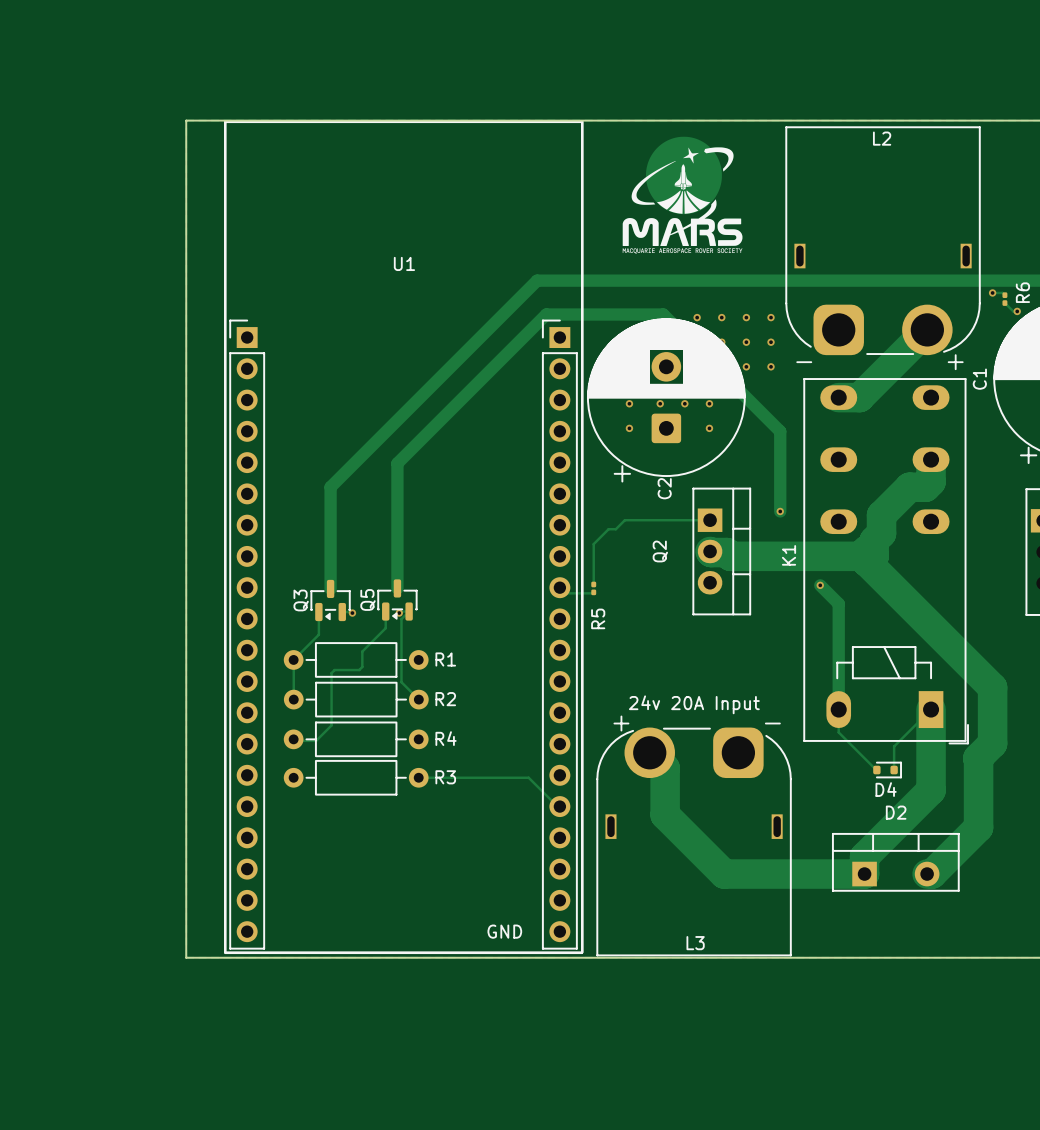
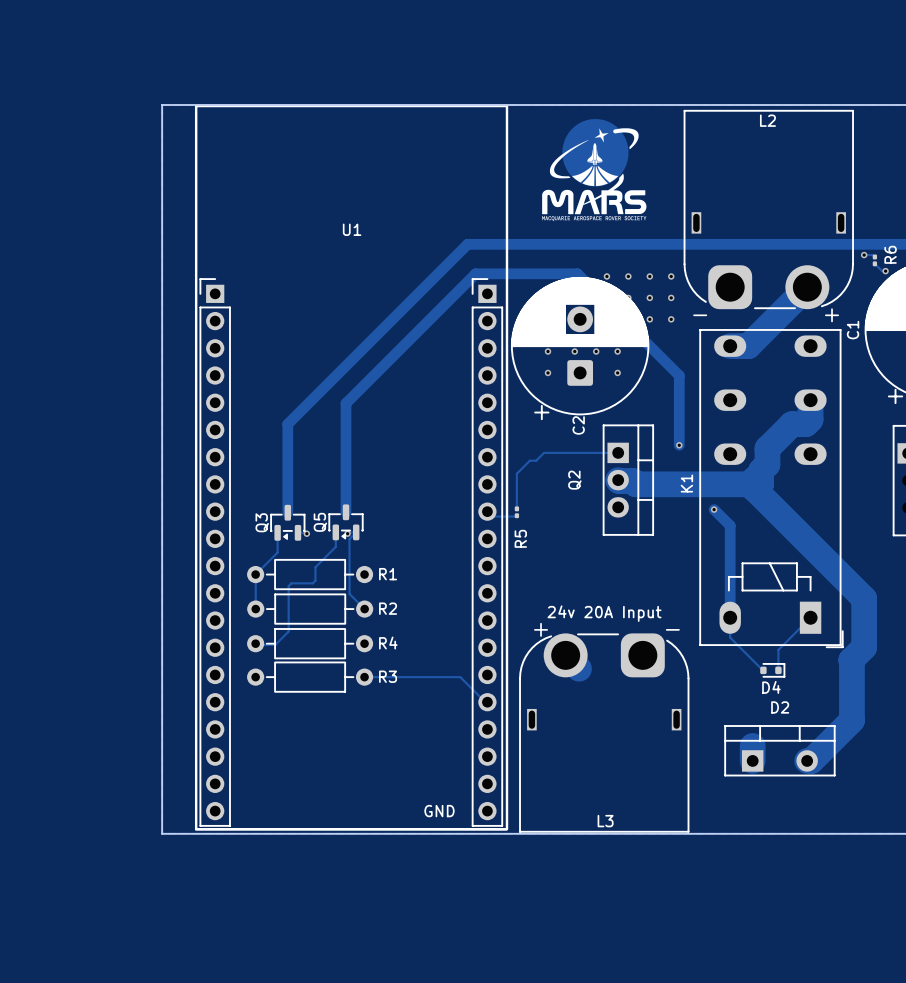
track: (931, 709) (931, 790) (864, 856) -> none
track: (665, 768) (665, 814) (724, 874) (864, 874) -> none

